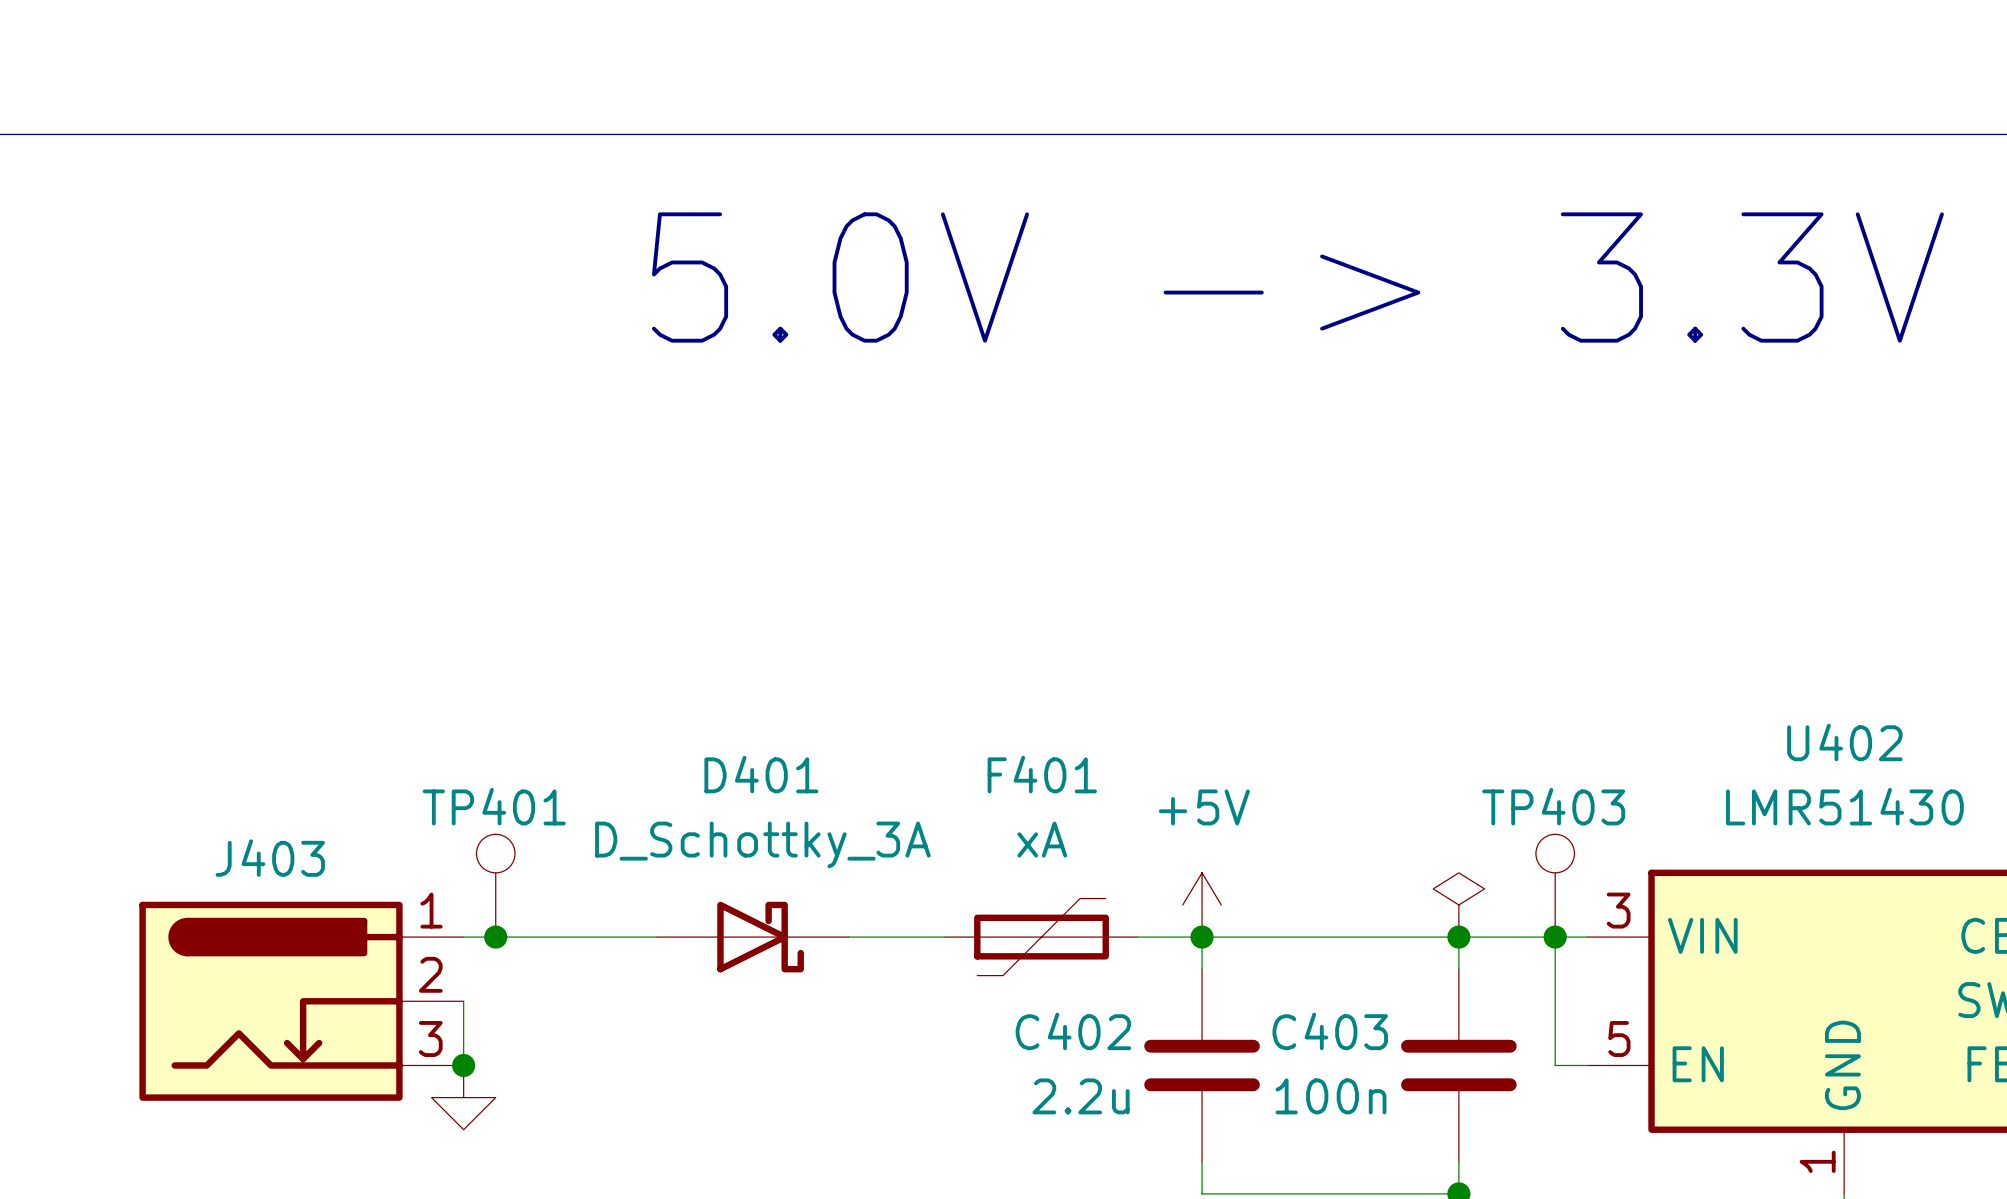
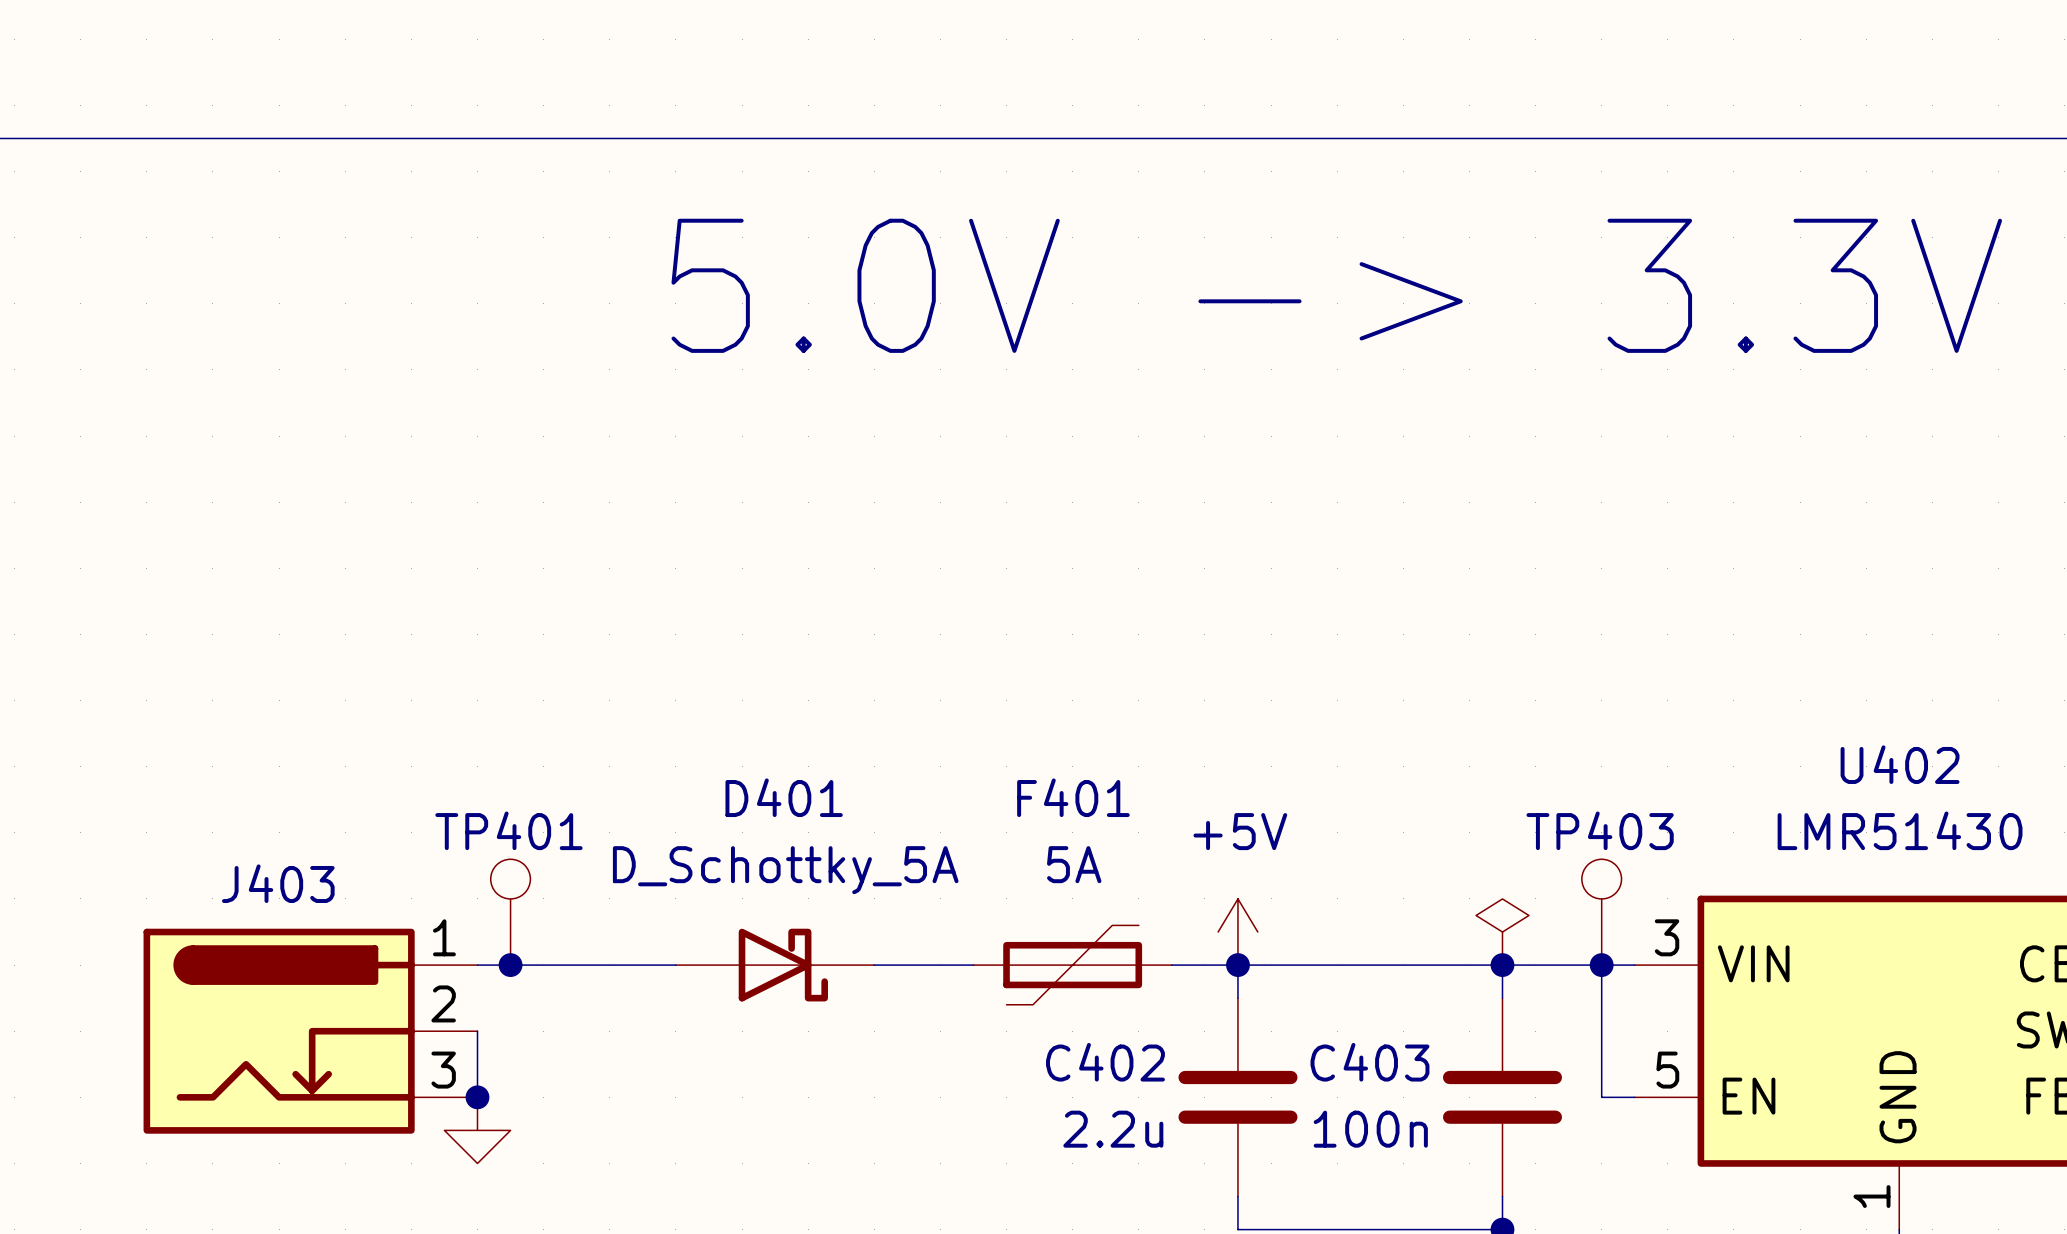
F401 value: xA (1042, 839) -> 5A (1074, 864)
D401 value: D_Schottky_3A (762, 844) -> D_Schottky_5A (785, 870)

